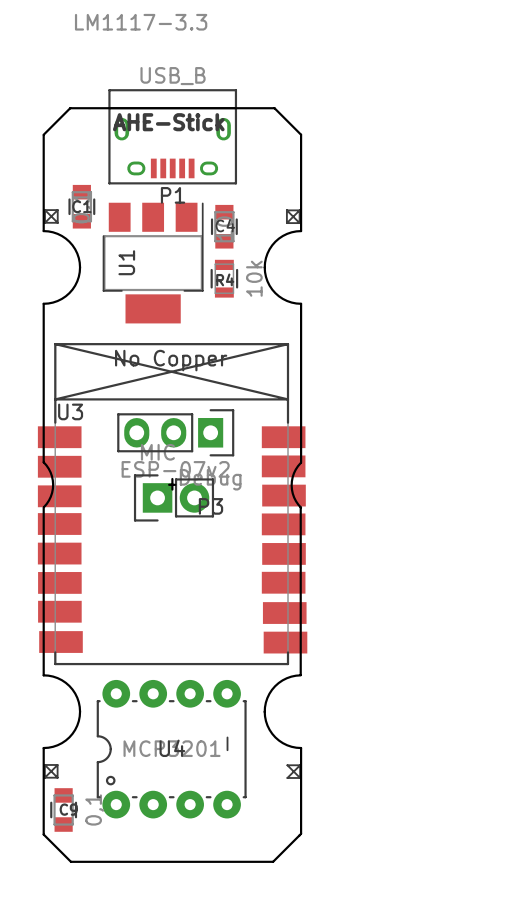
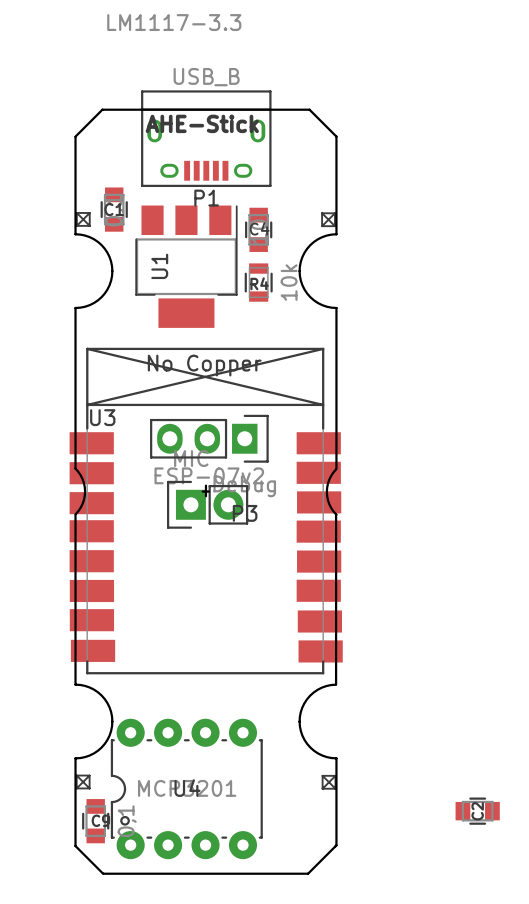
line: (227, 737) (227, 750) -> (322, 775) (322, 788)
U4 position: (171, 749) -> (186, 788)
C2: none -> (477, 811)

